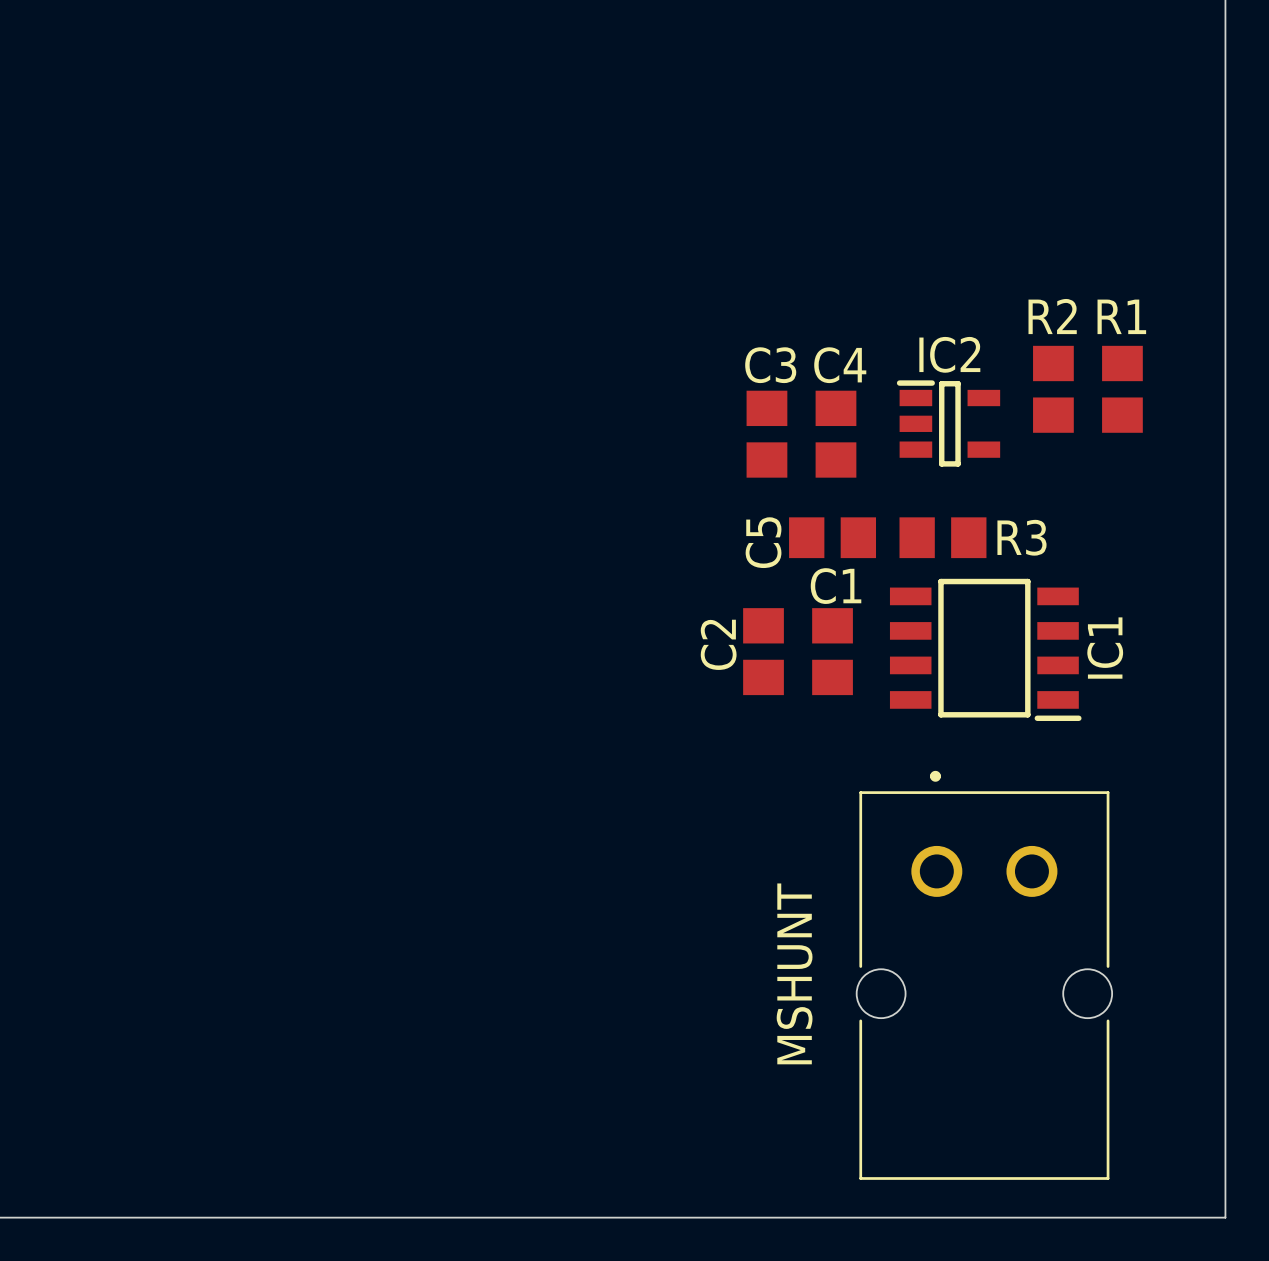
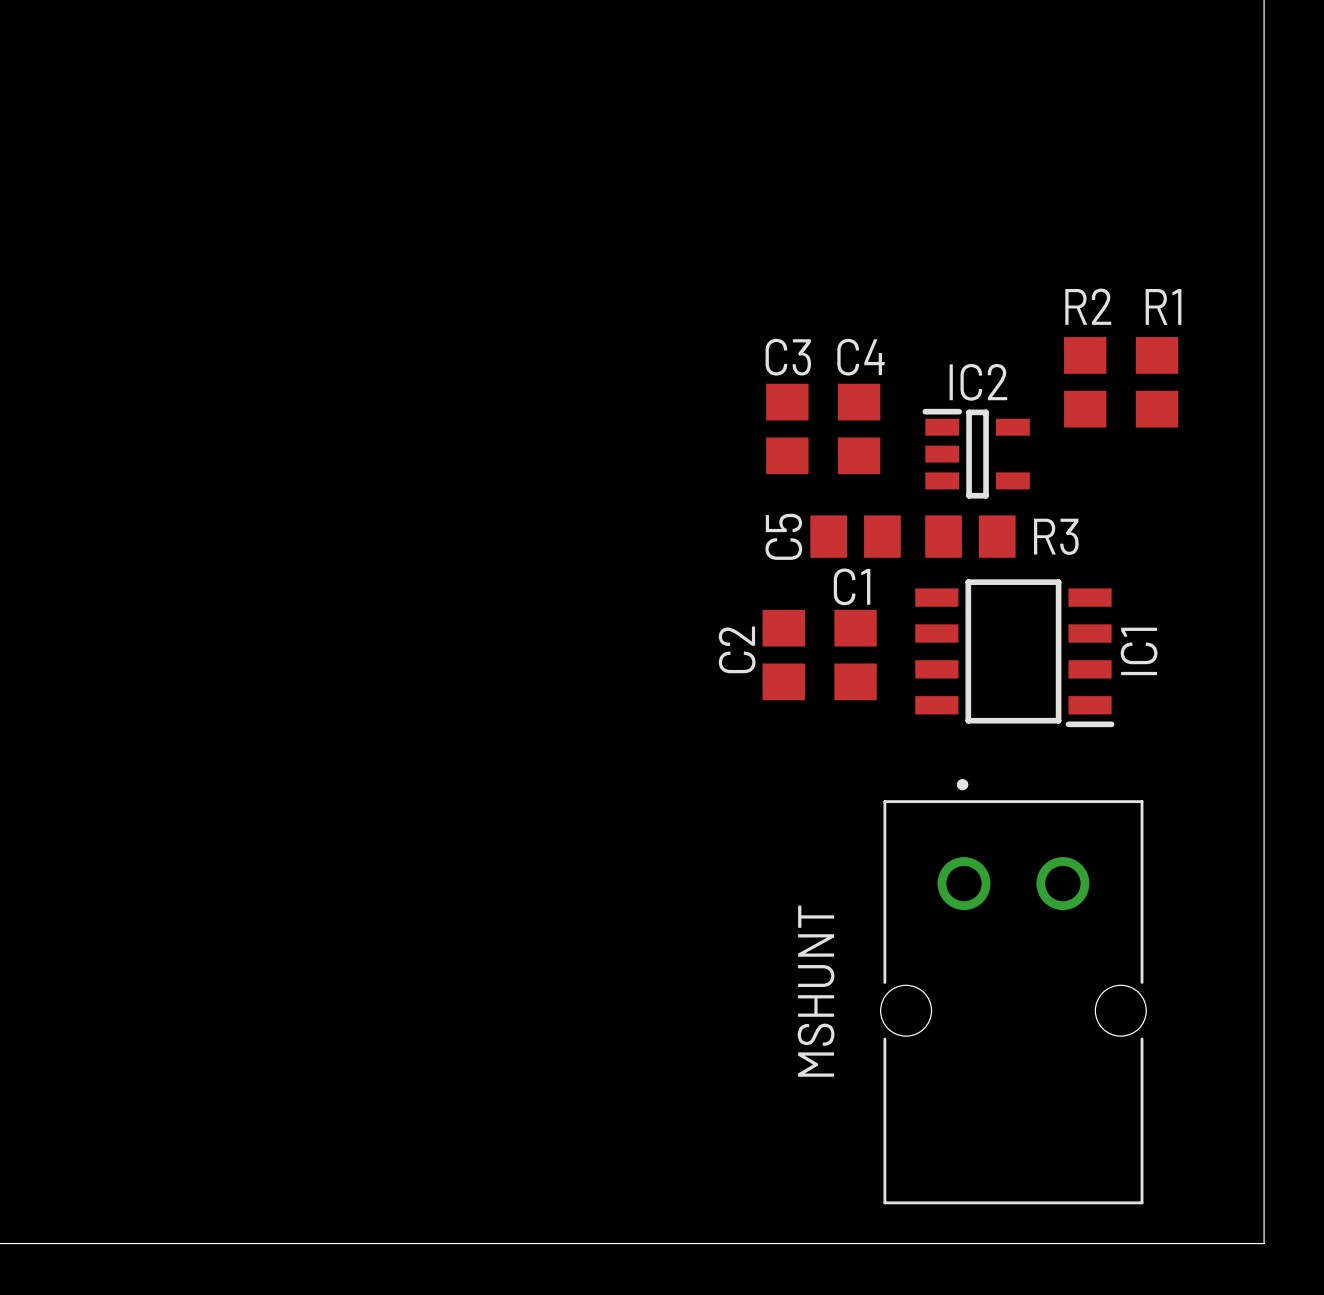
IC2 position: (948, 423) -> (976, 453)

